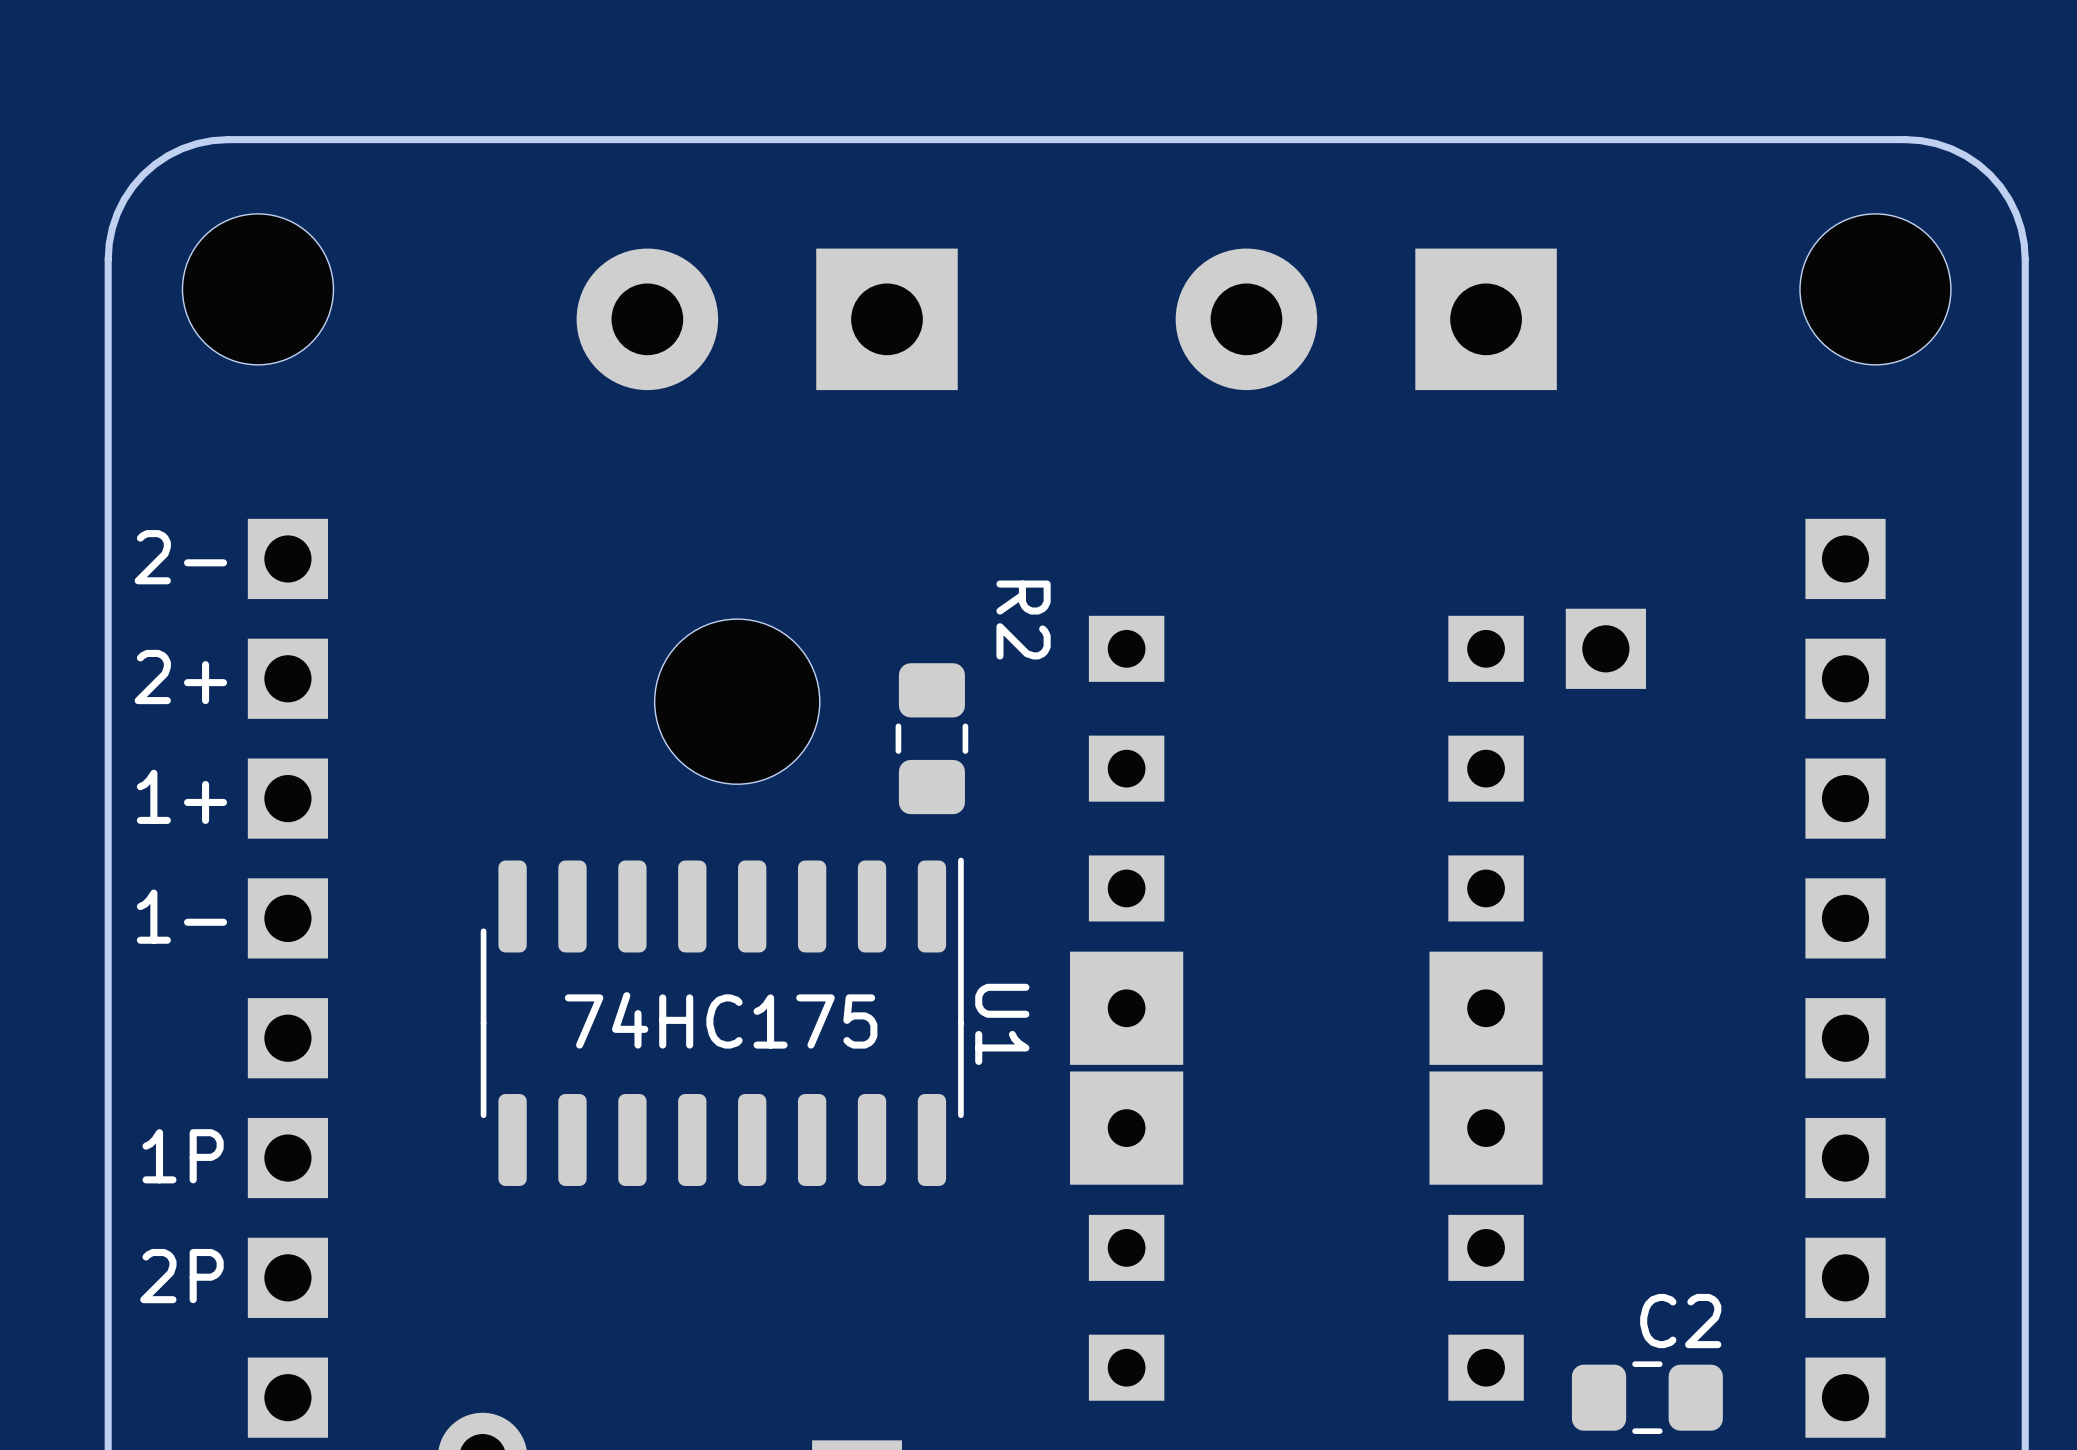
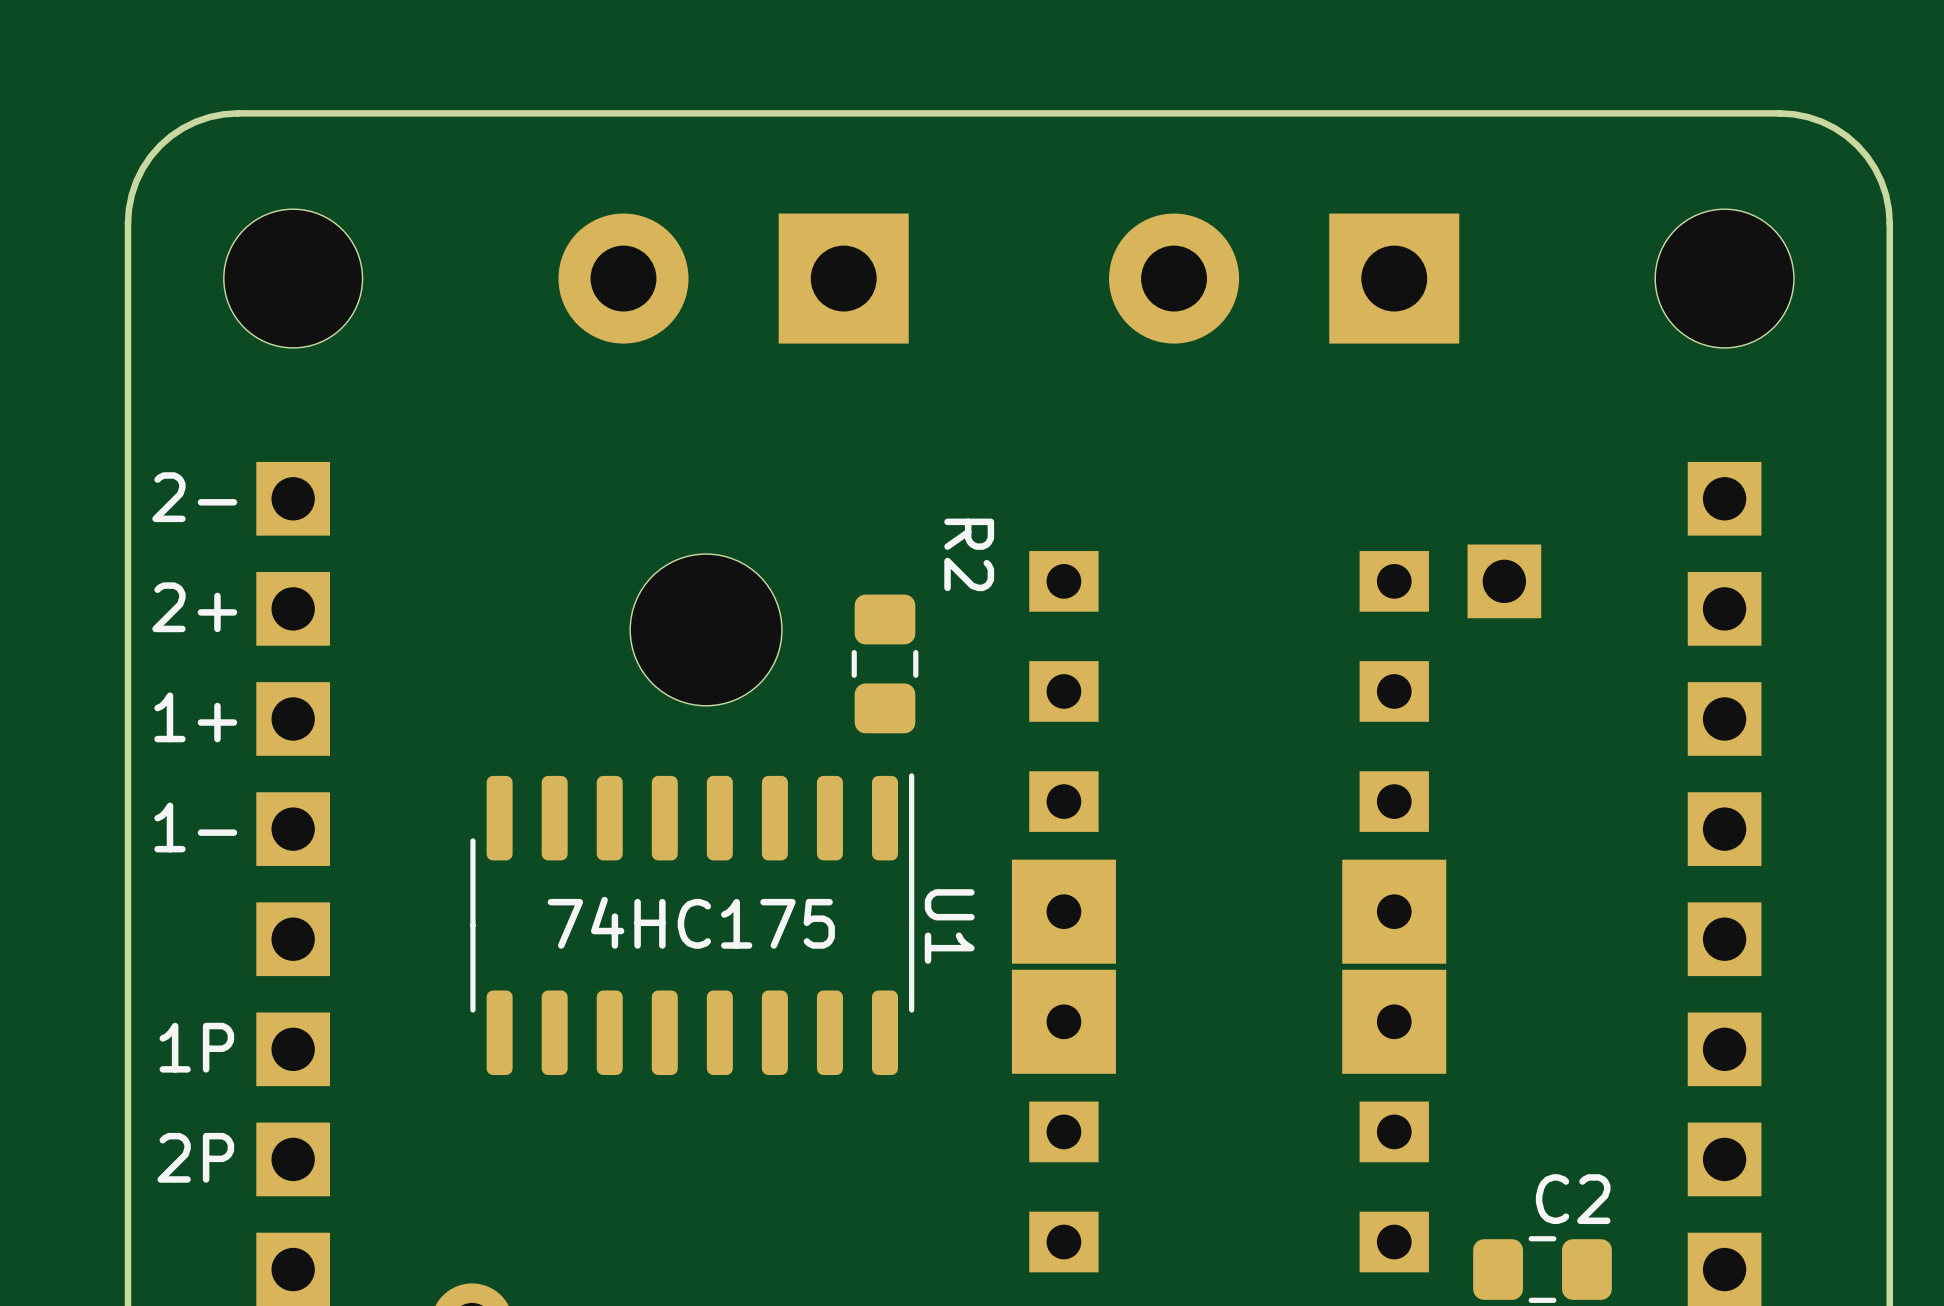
part position: (257, 289) -> (293, 278)
part position: (1875, 289) -> (1724, 278)

